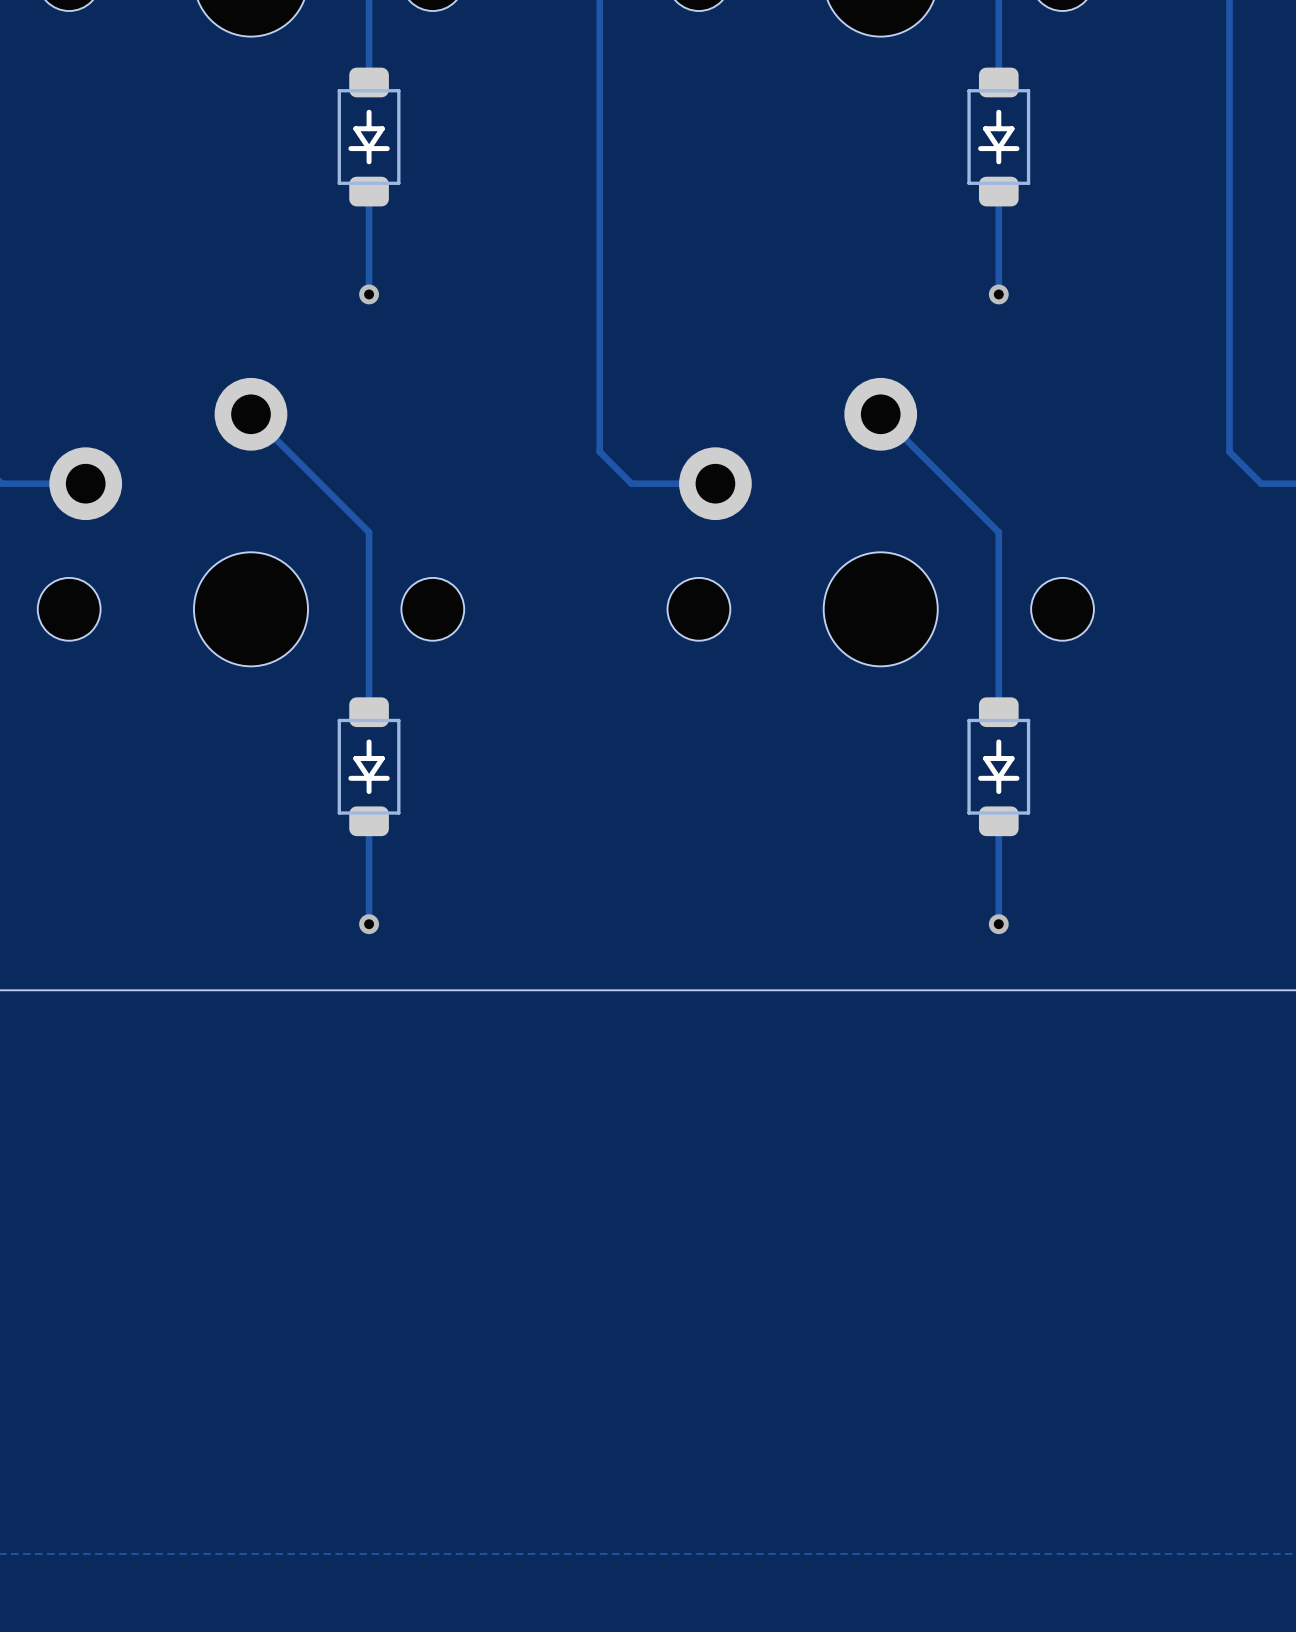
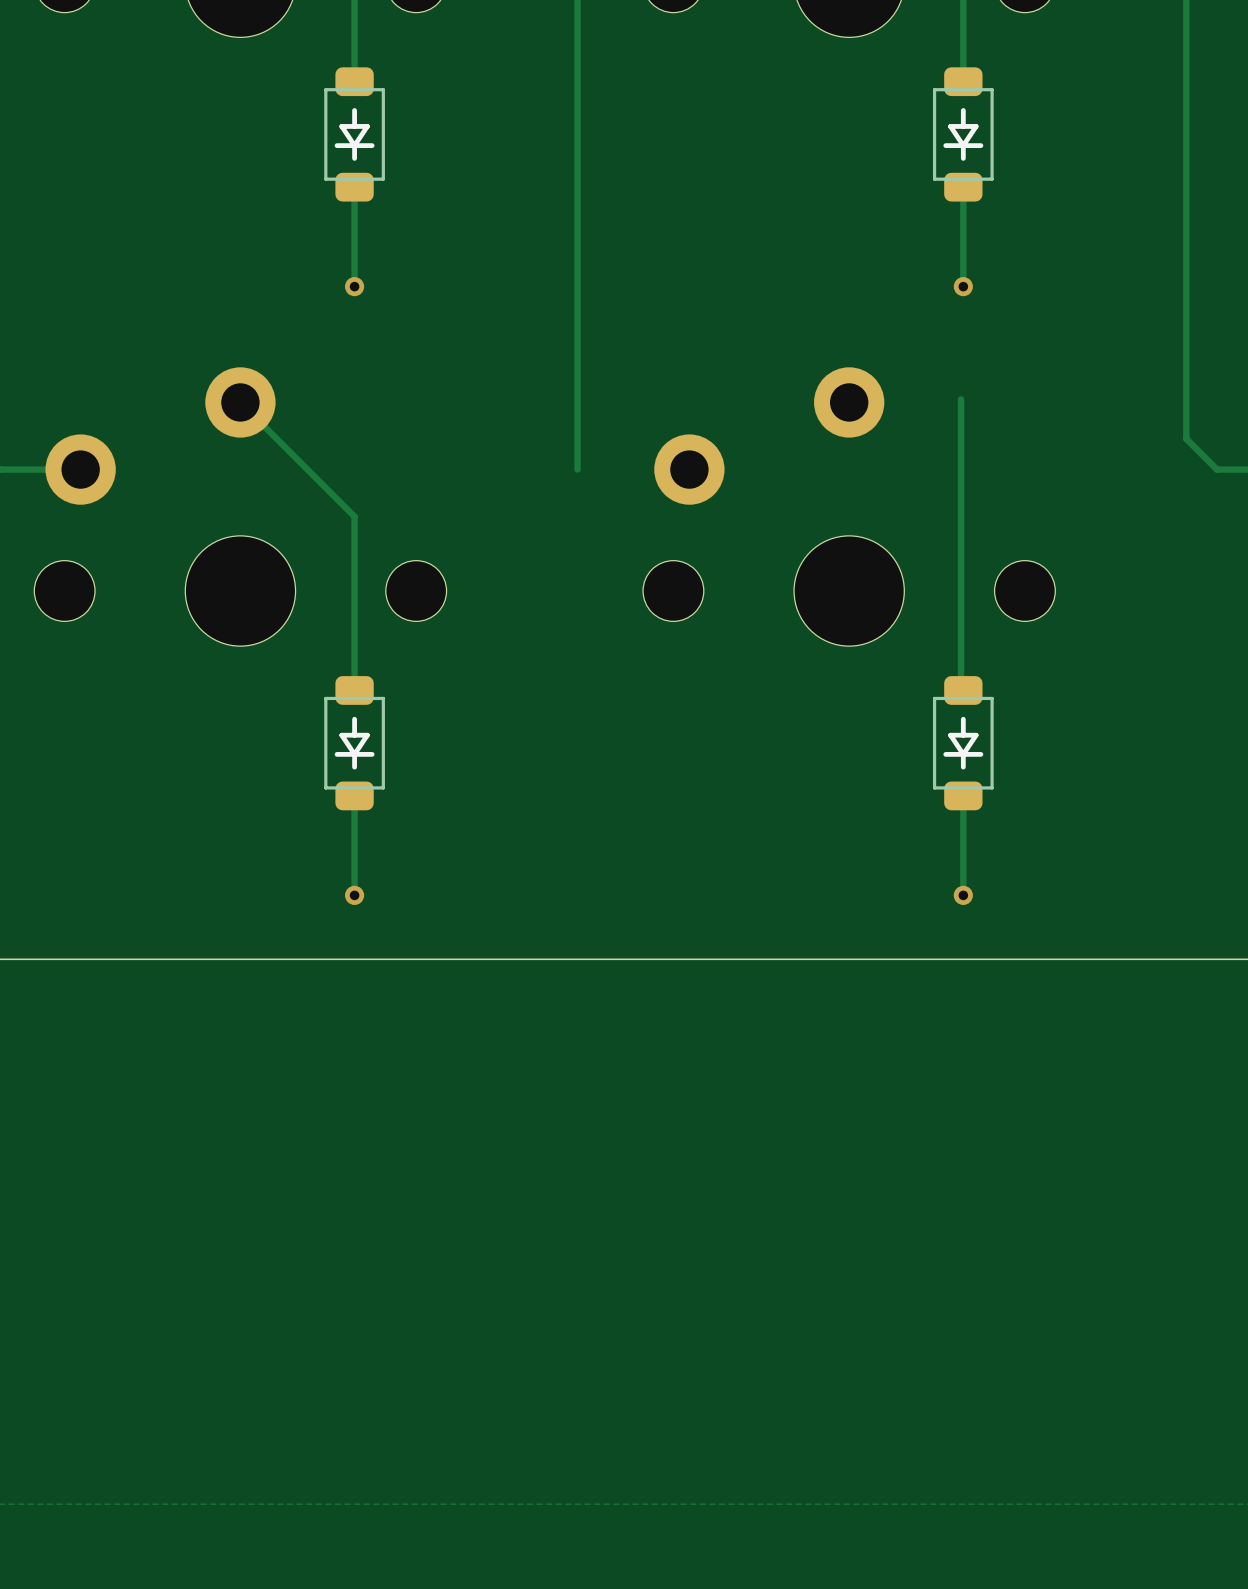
track: (880, 414) (998, 532) (998, 712) -> (961, 399) (961, 688) (963, 690)
track: (599, 451) (631, 483) (715, 483) -> (577, 438) (577, 469)

